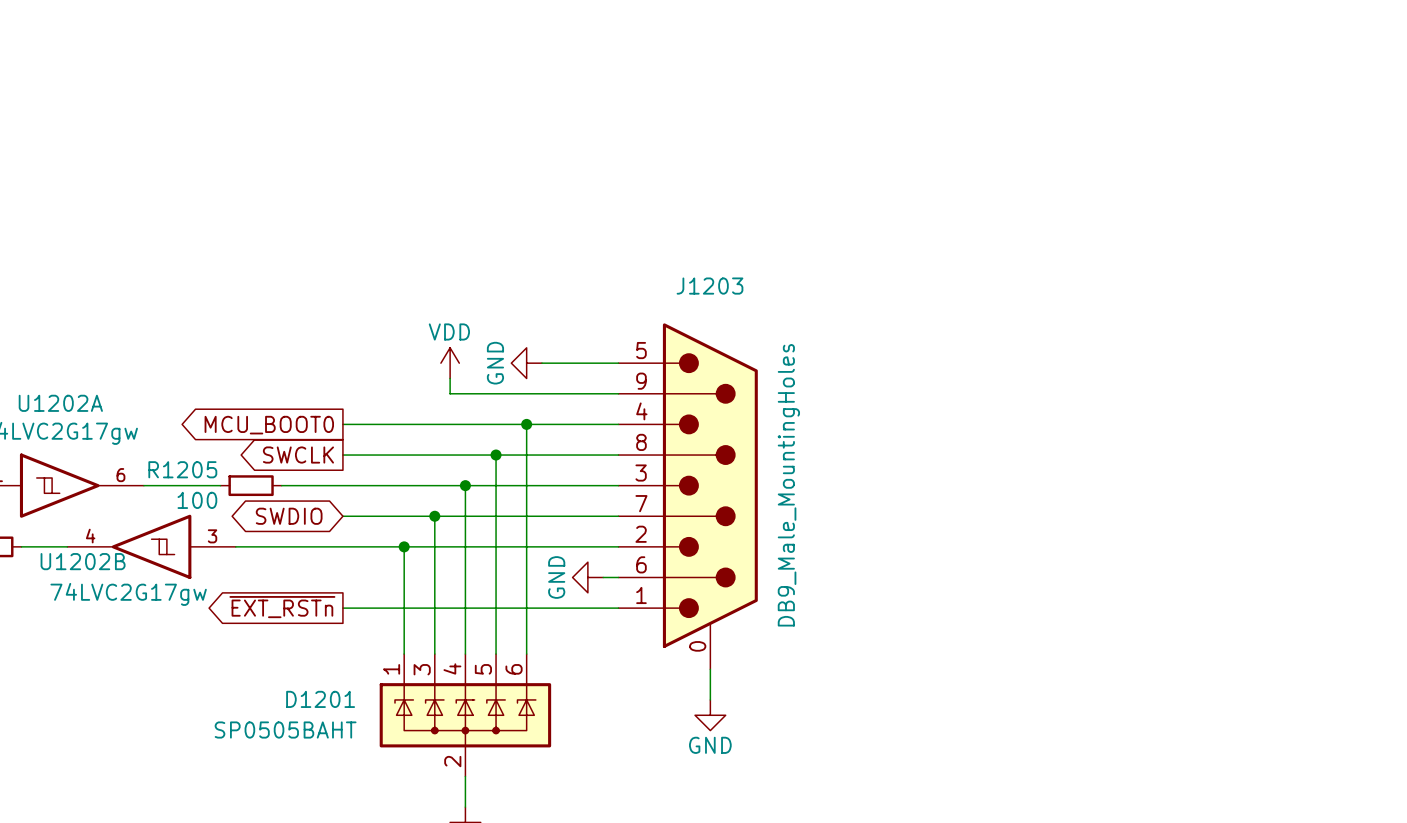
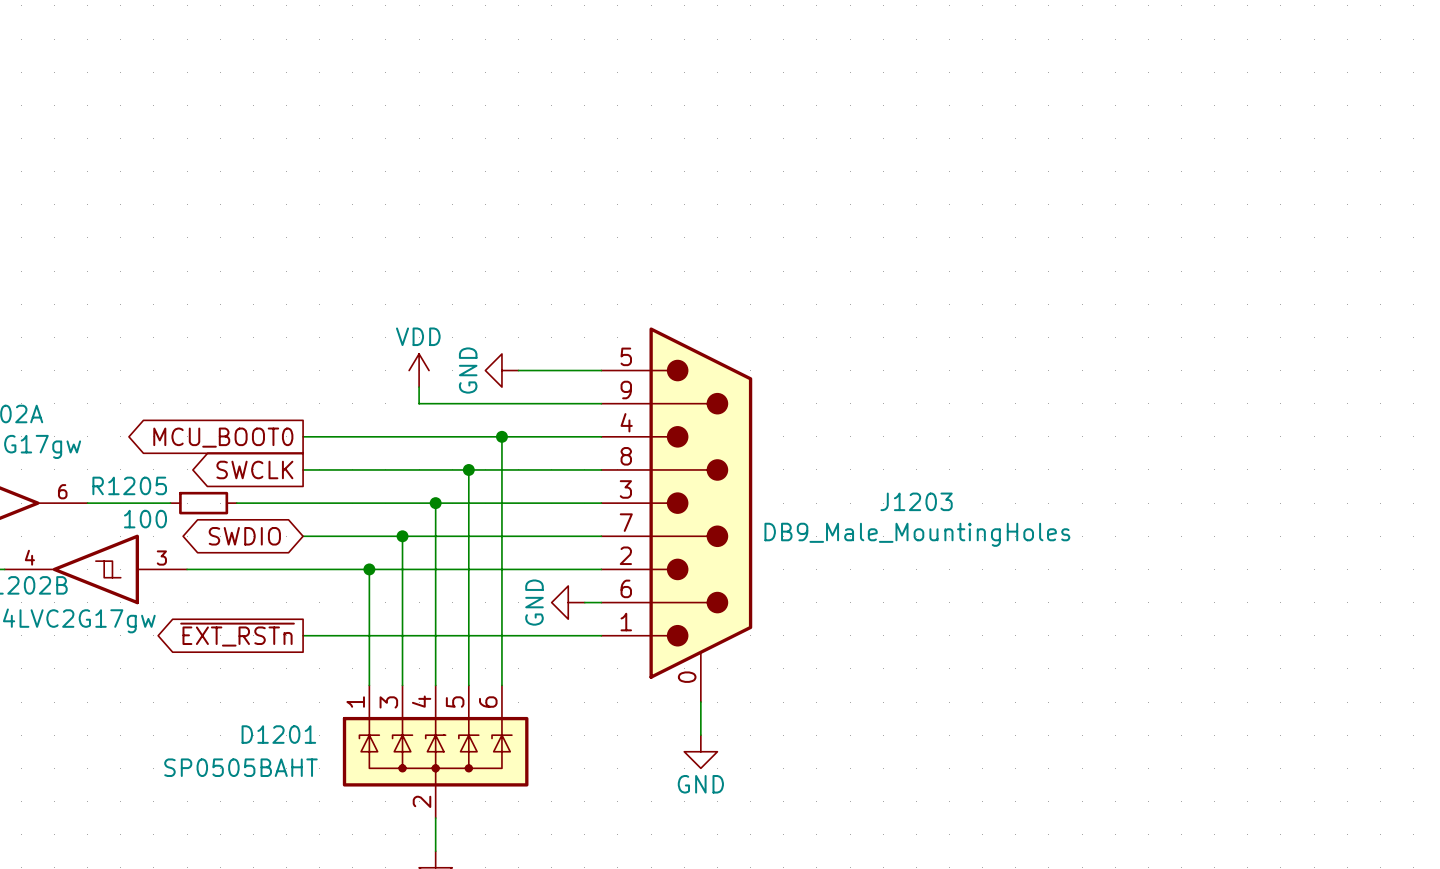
J1203 name position: J1203 (709, 286) -> J1203 (916, 501)
J1203 value rotation: 0° (788, 485) -> 90° clockwise (917, 534)

